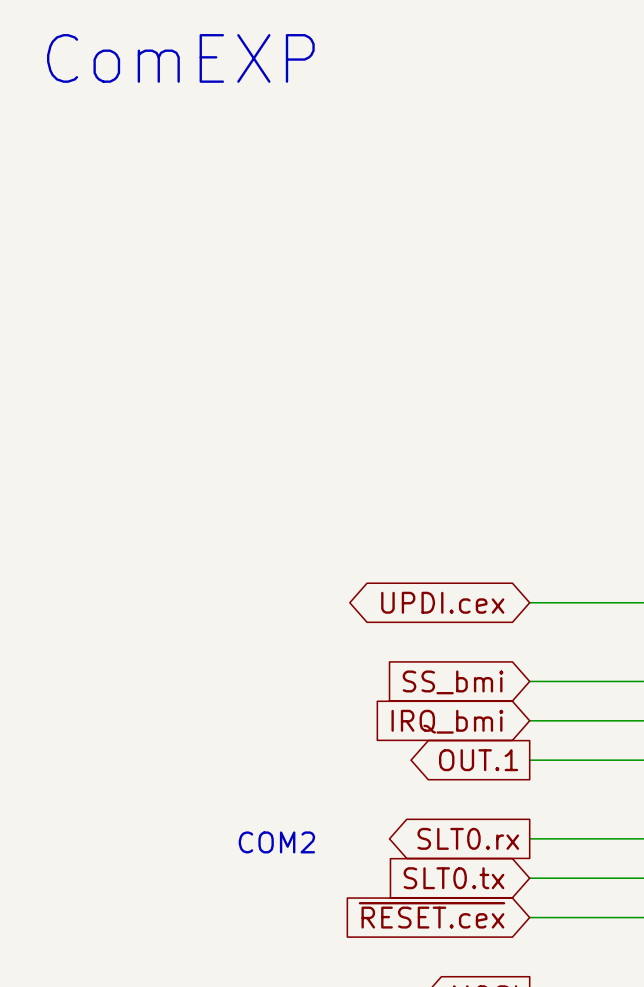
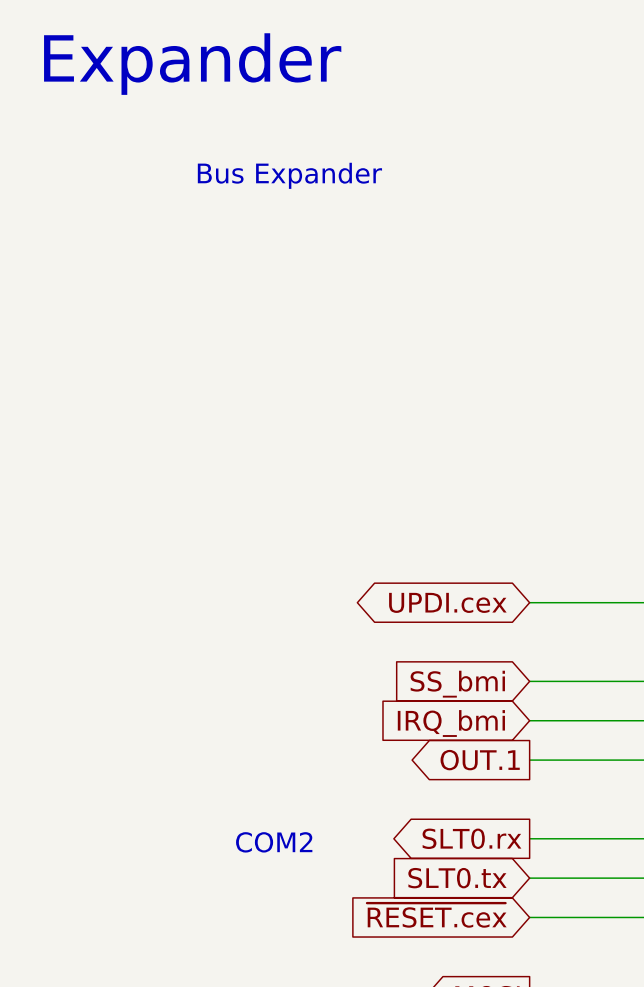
text: ComEXP (180, 58) -> Expander (192, 64)
text: none -> Bus Expander (289, 175)

